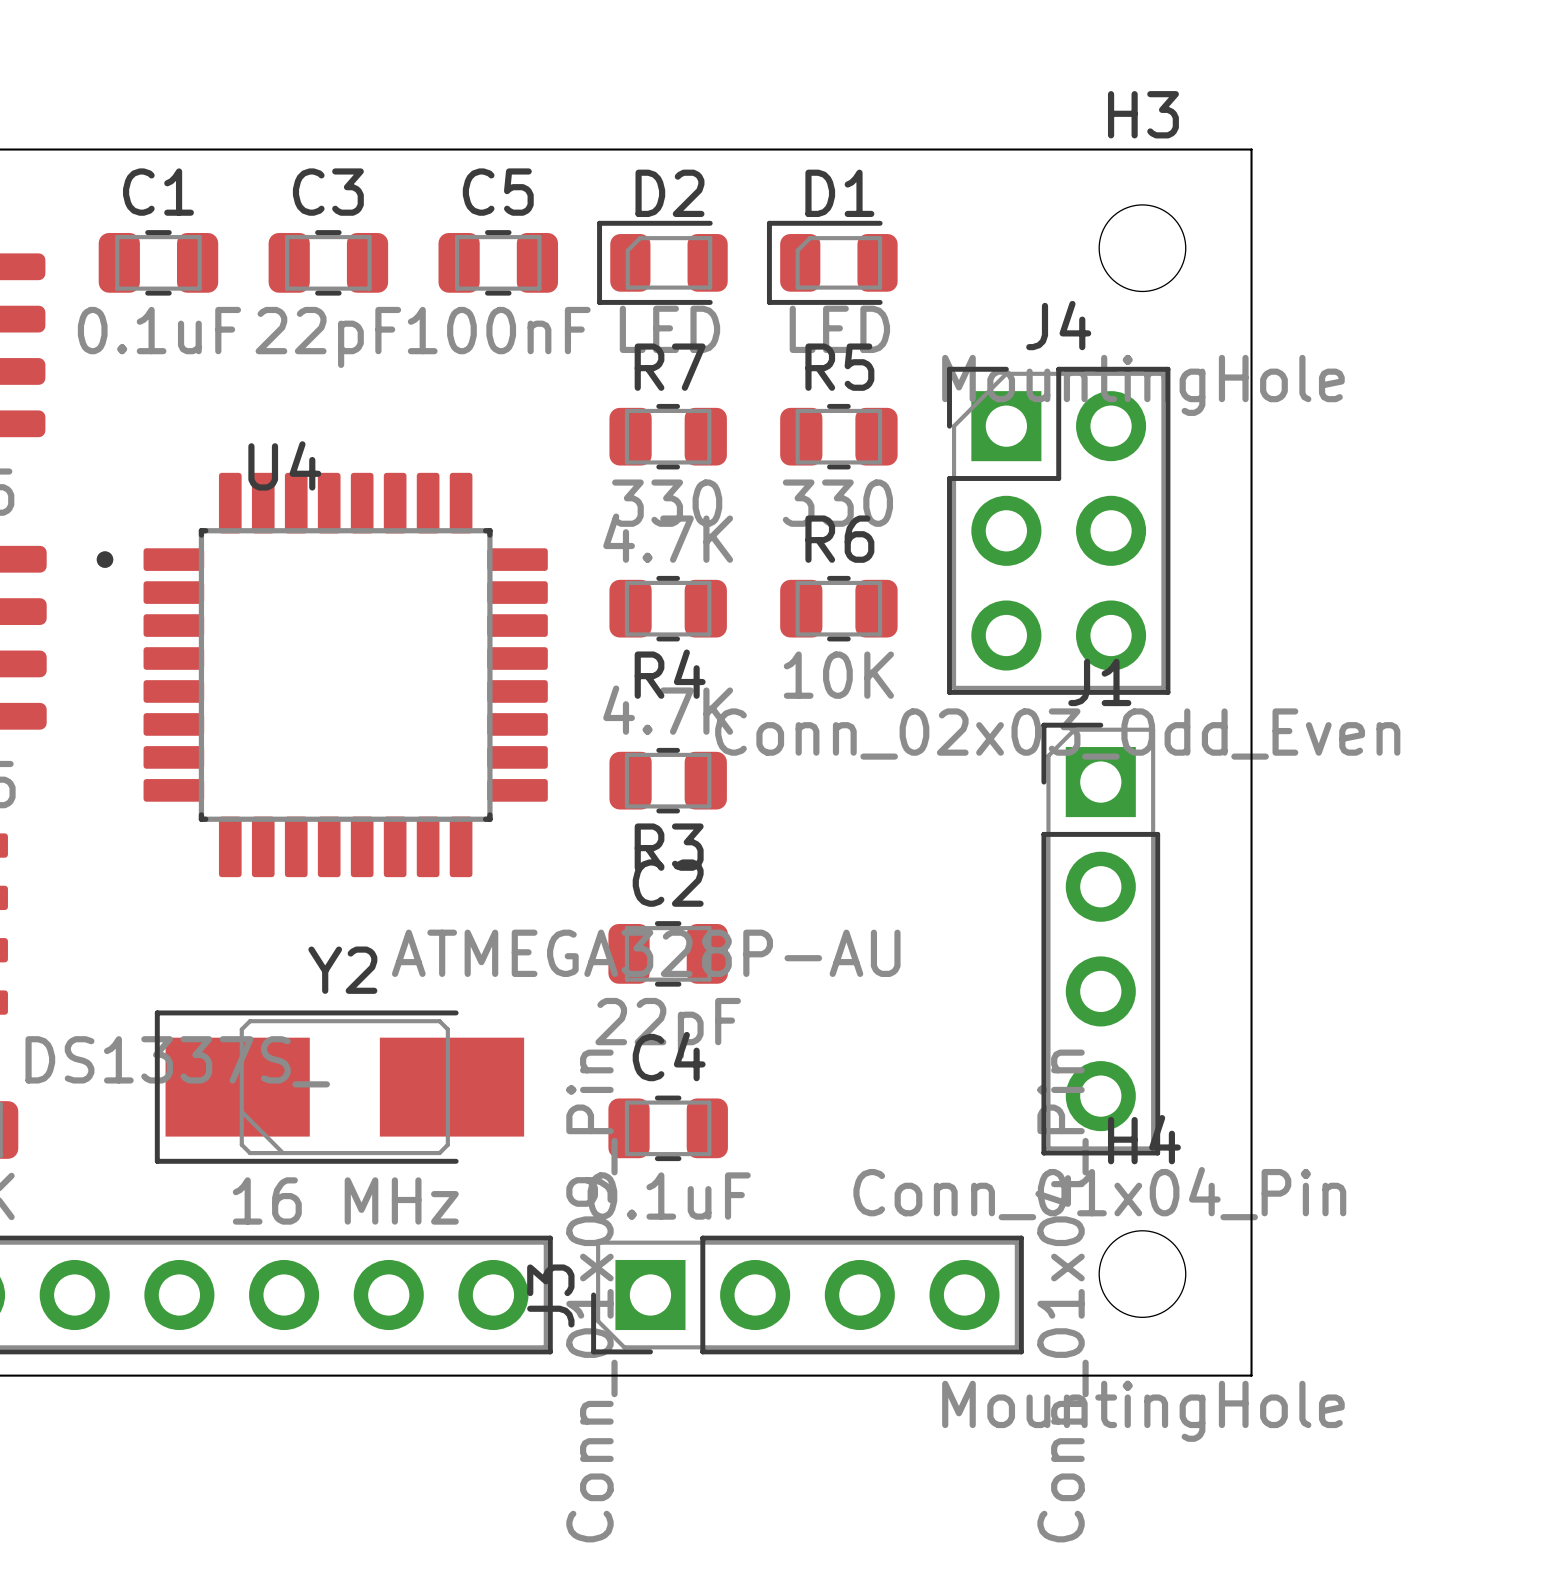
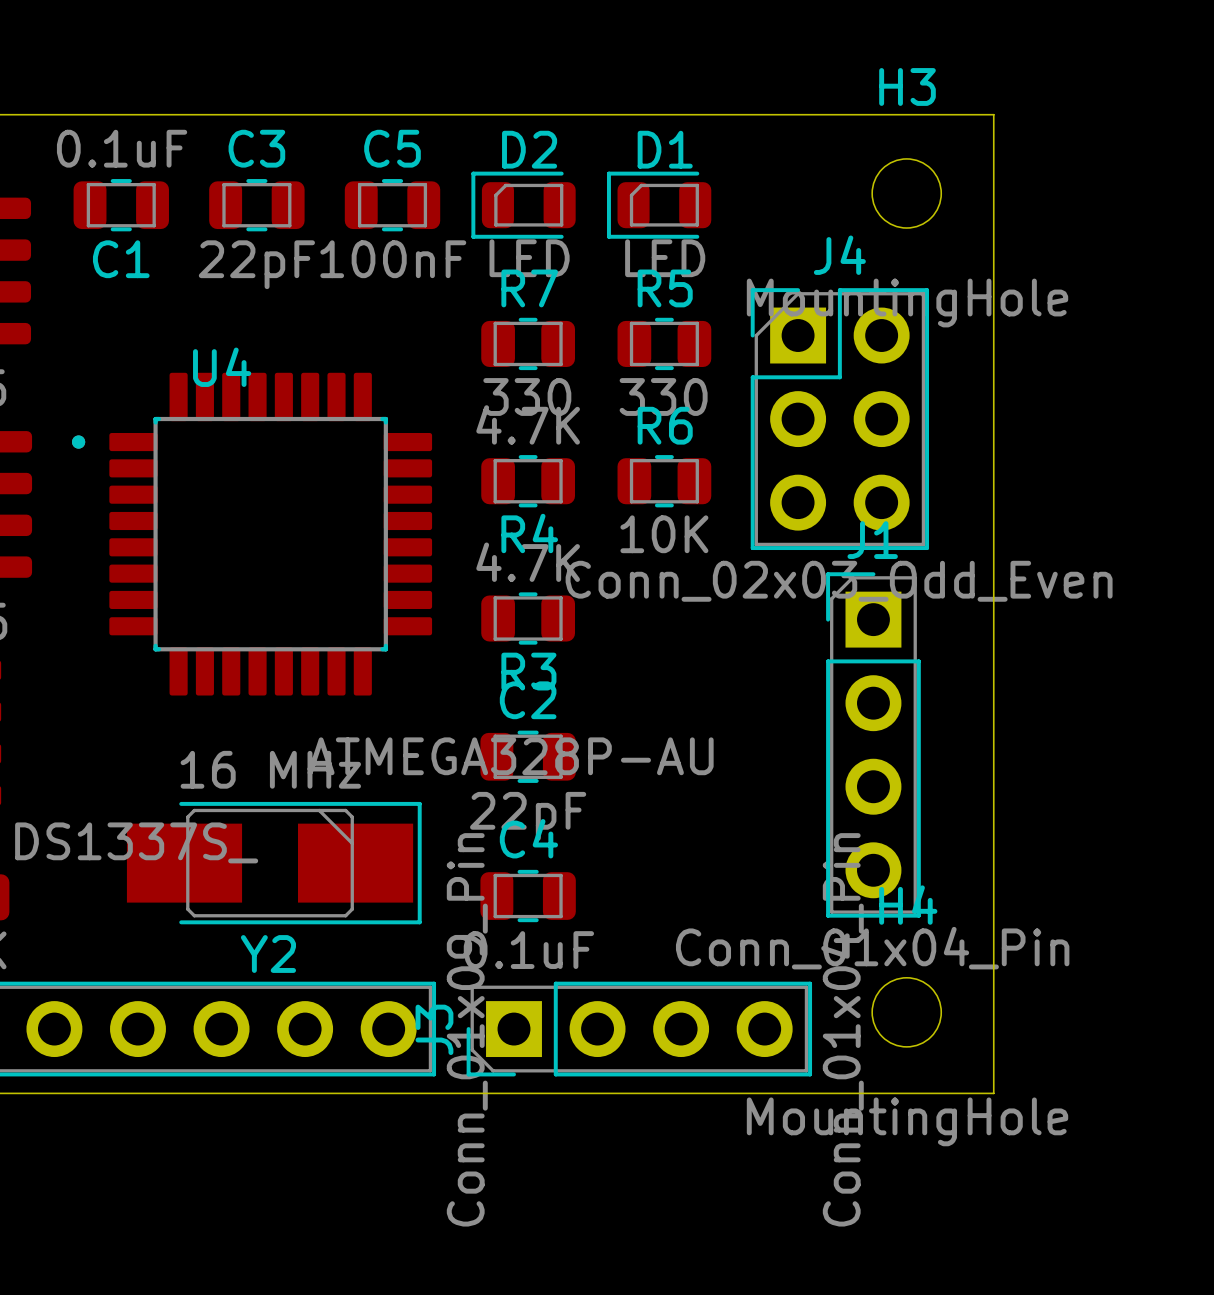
C1 name position: C1 (158, 192) -> C1 (121, 259)
C1 value position: 0.1uF (159, 330) -> 0.1uF (122, 148)
Y2 rotation: 0° (339, 1087) -> 180° (274, 863)

